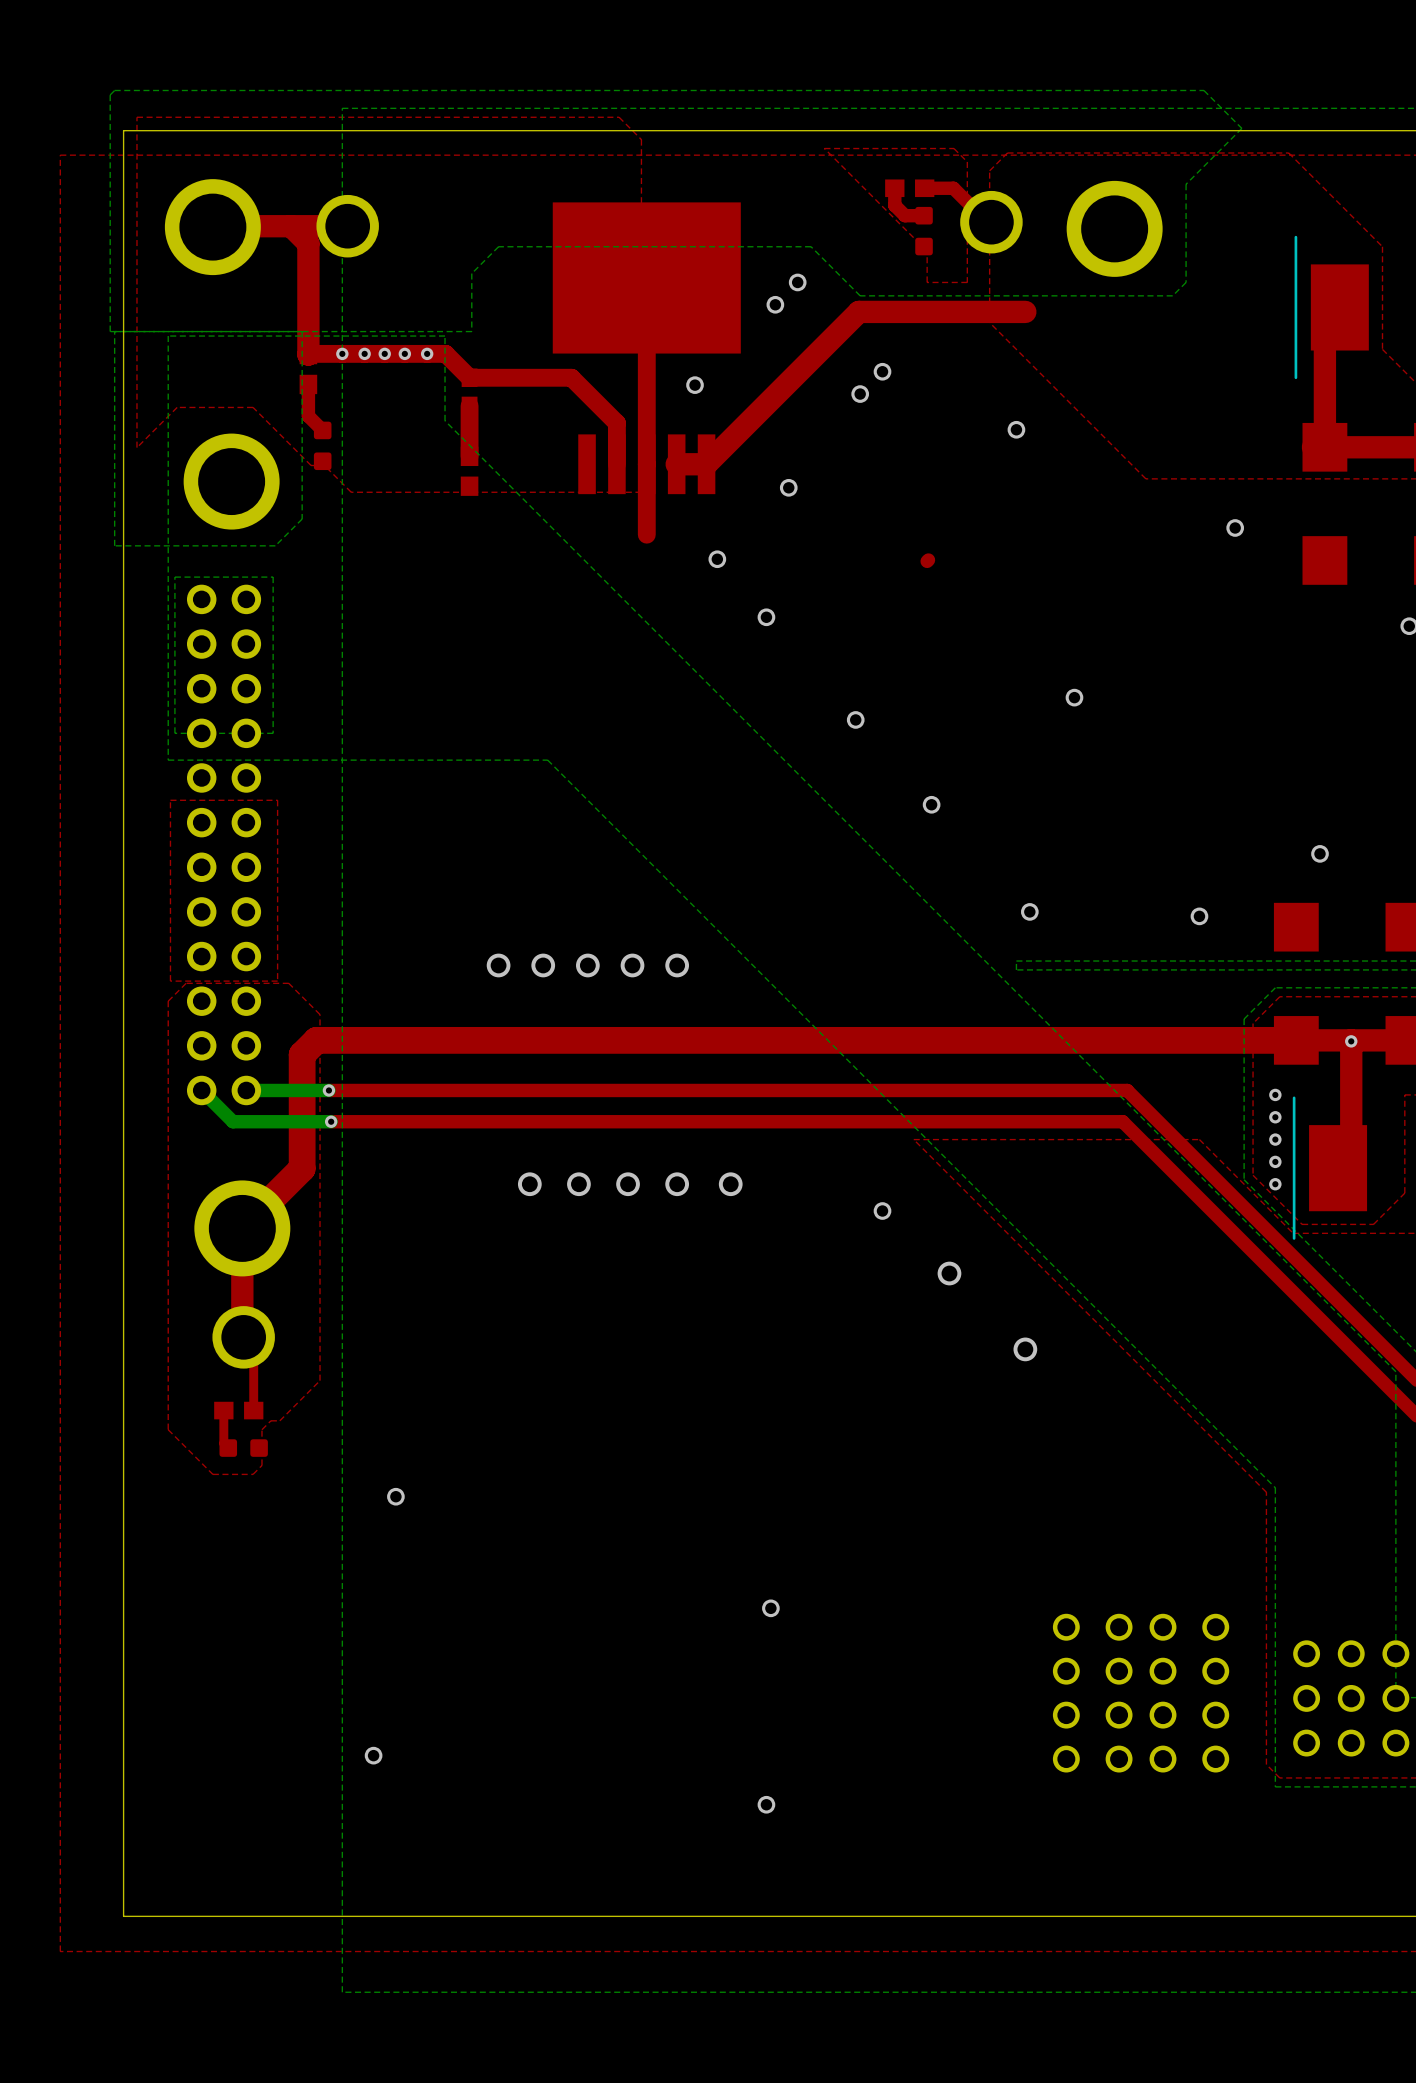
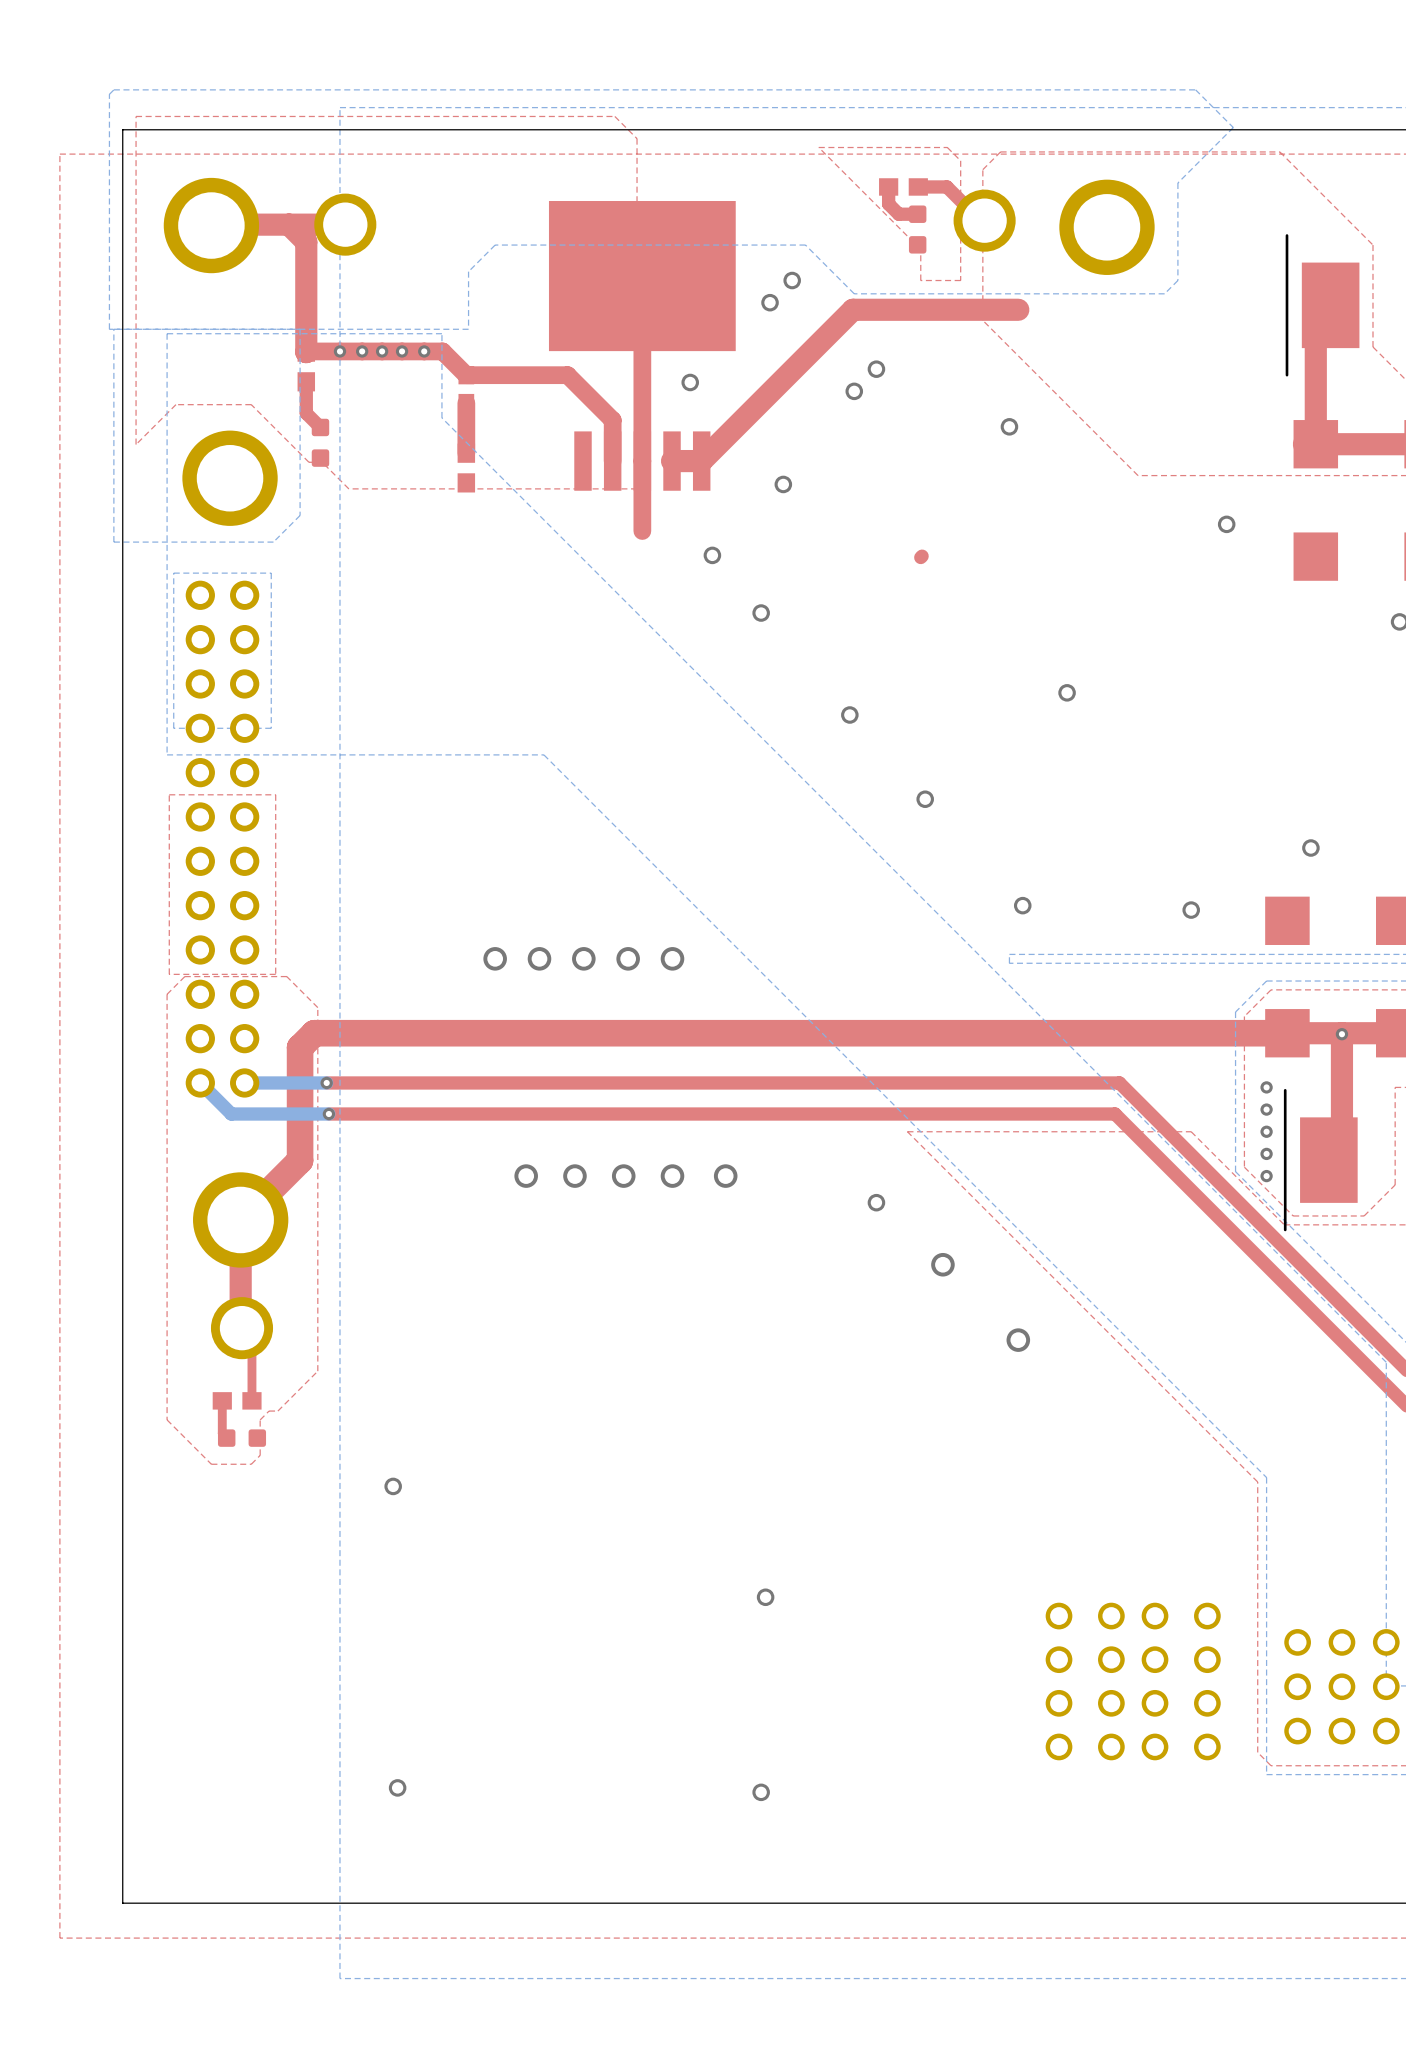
via position: (373, 1755) -> (397, 1787)

